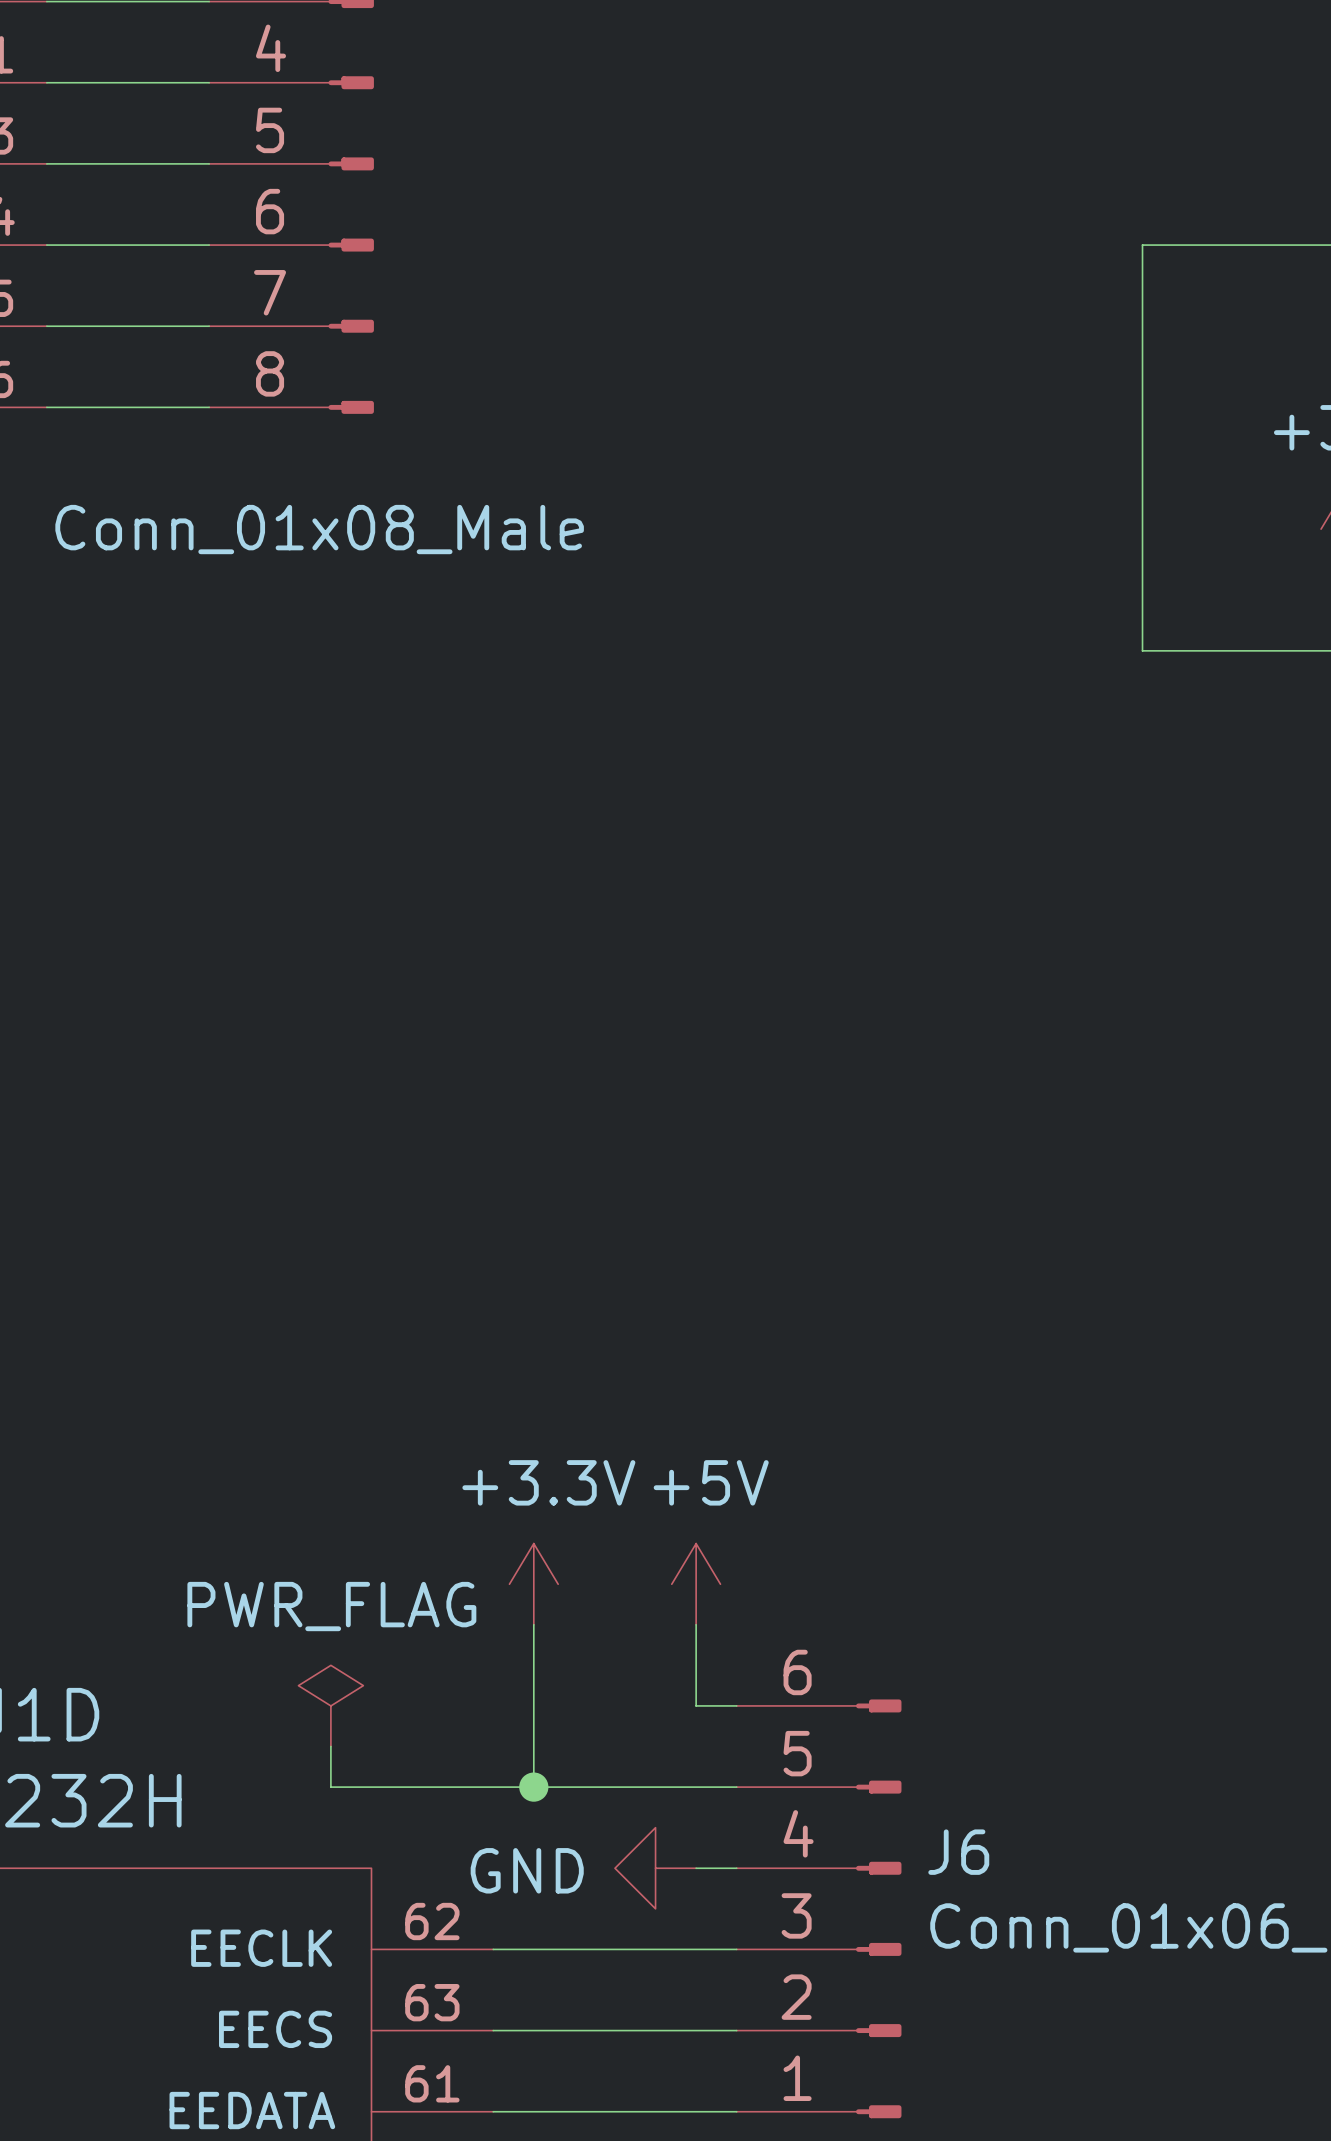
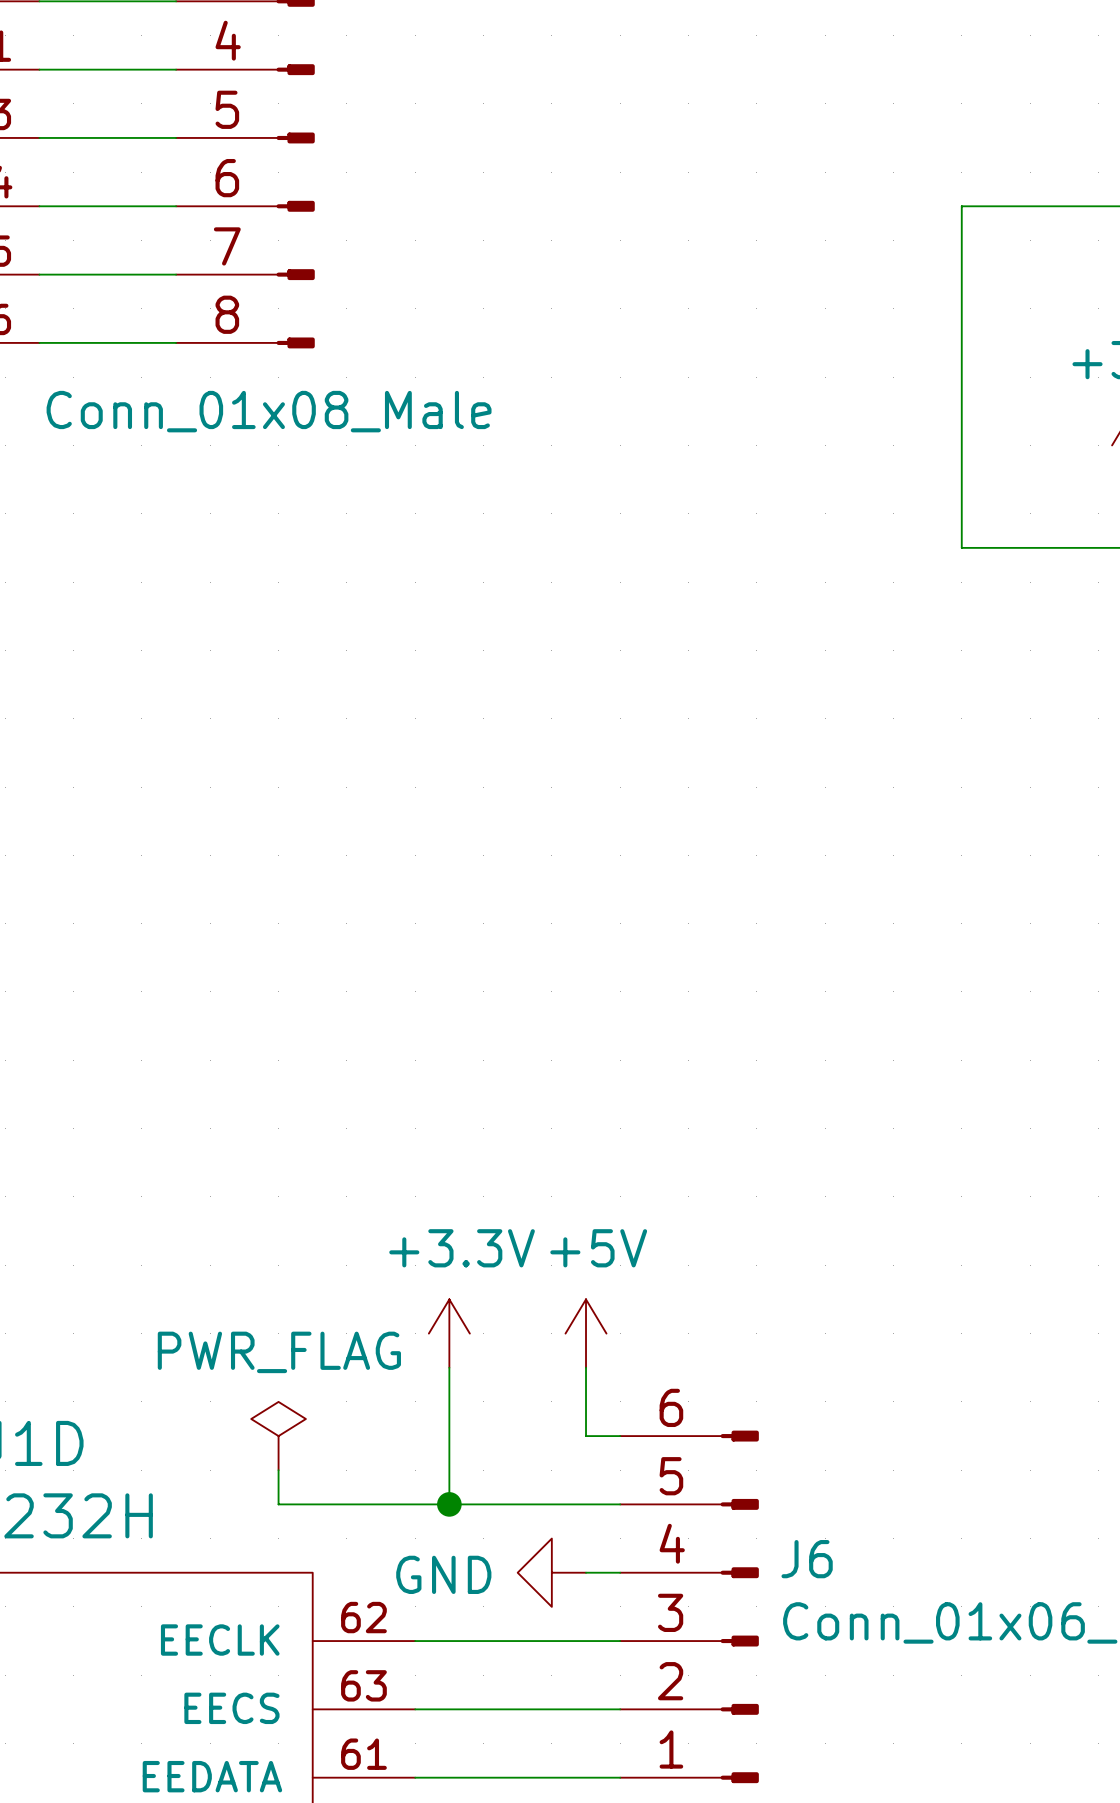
part value position: Conn_01x08_Male (319, 529) -> Conn_01x08_Male (269, 411)

